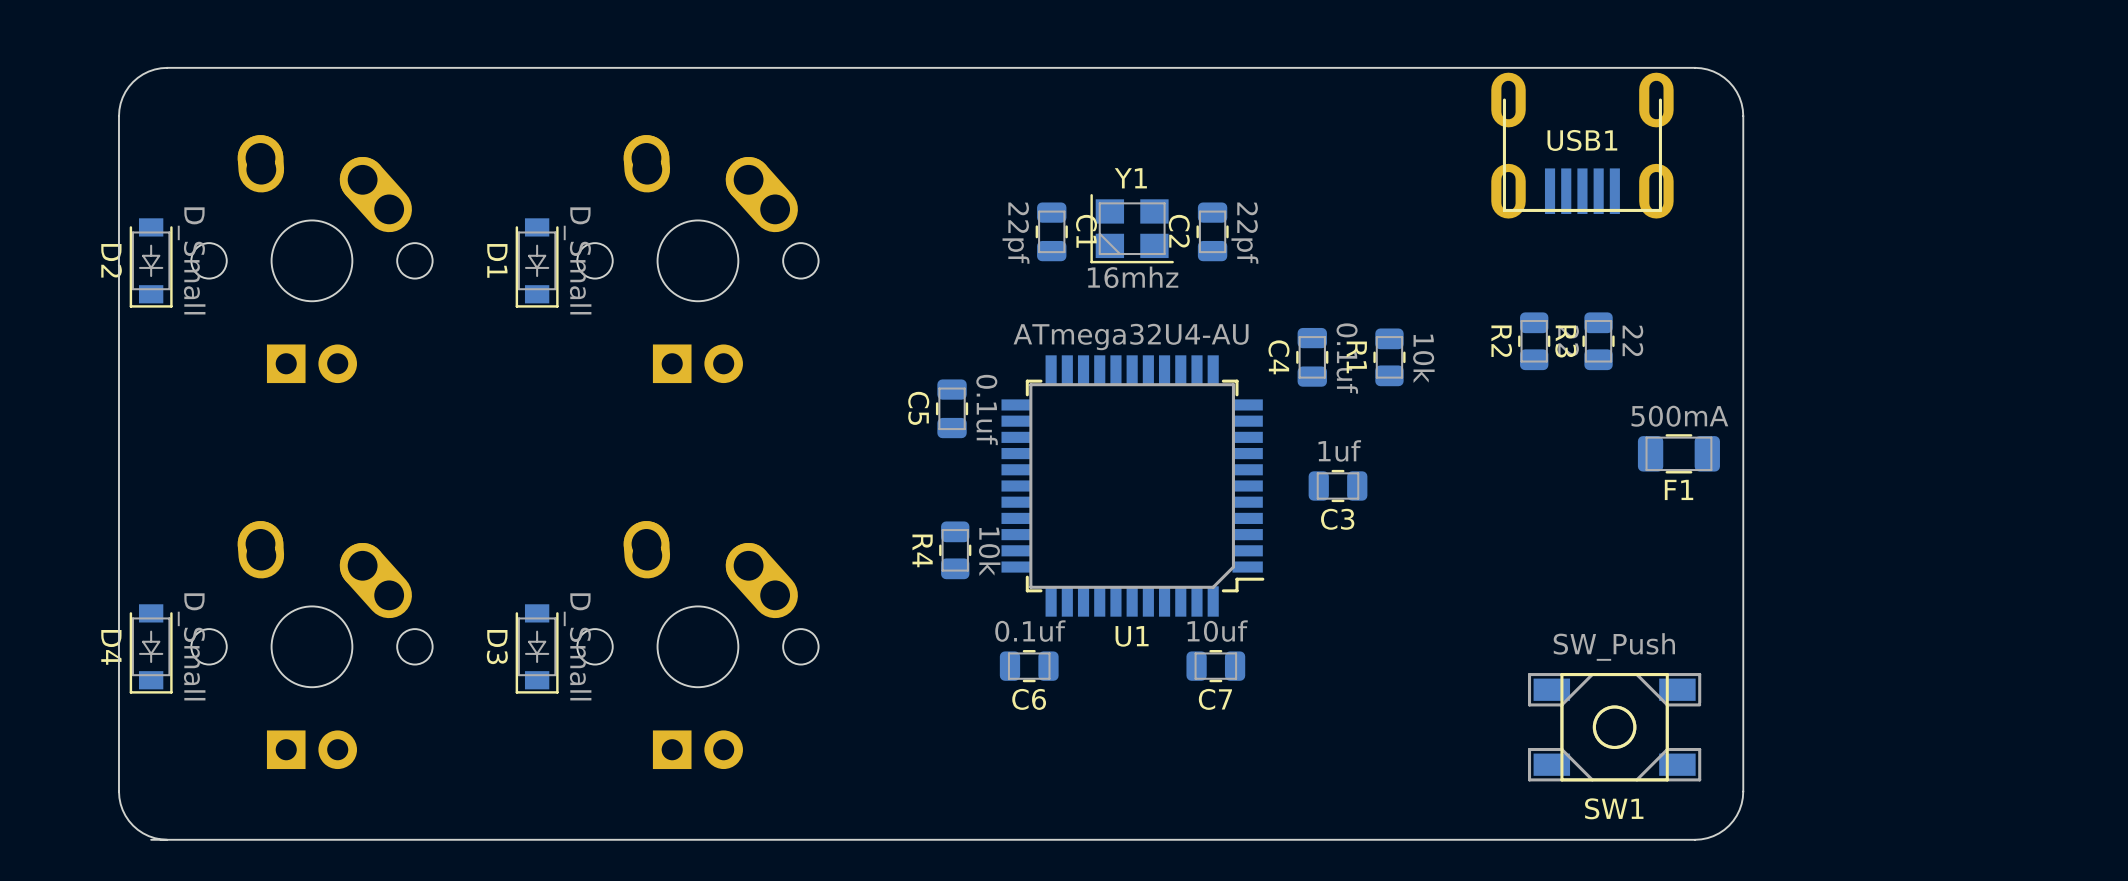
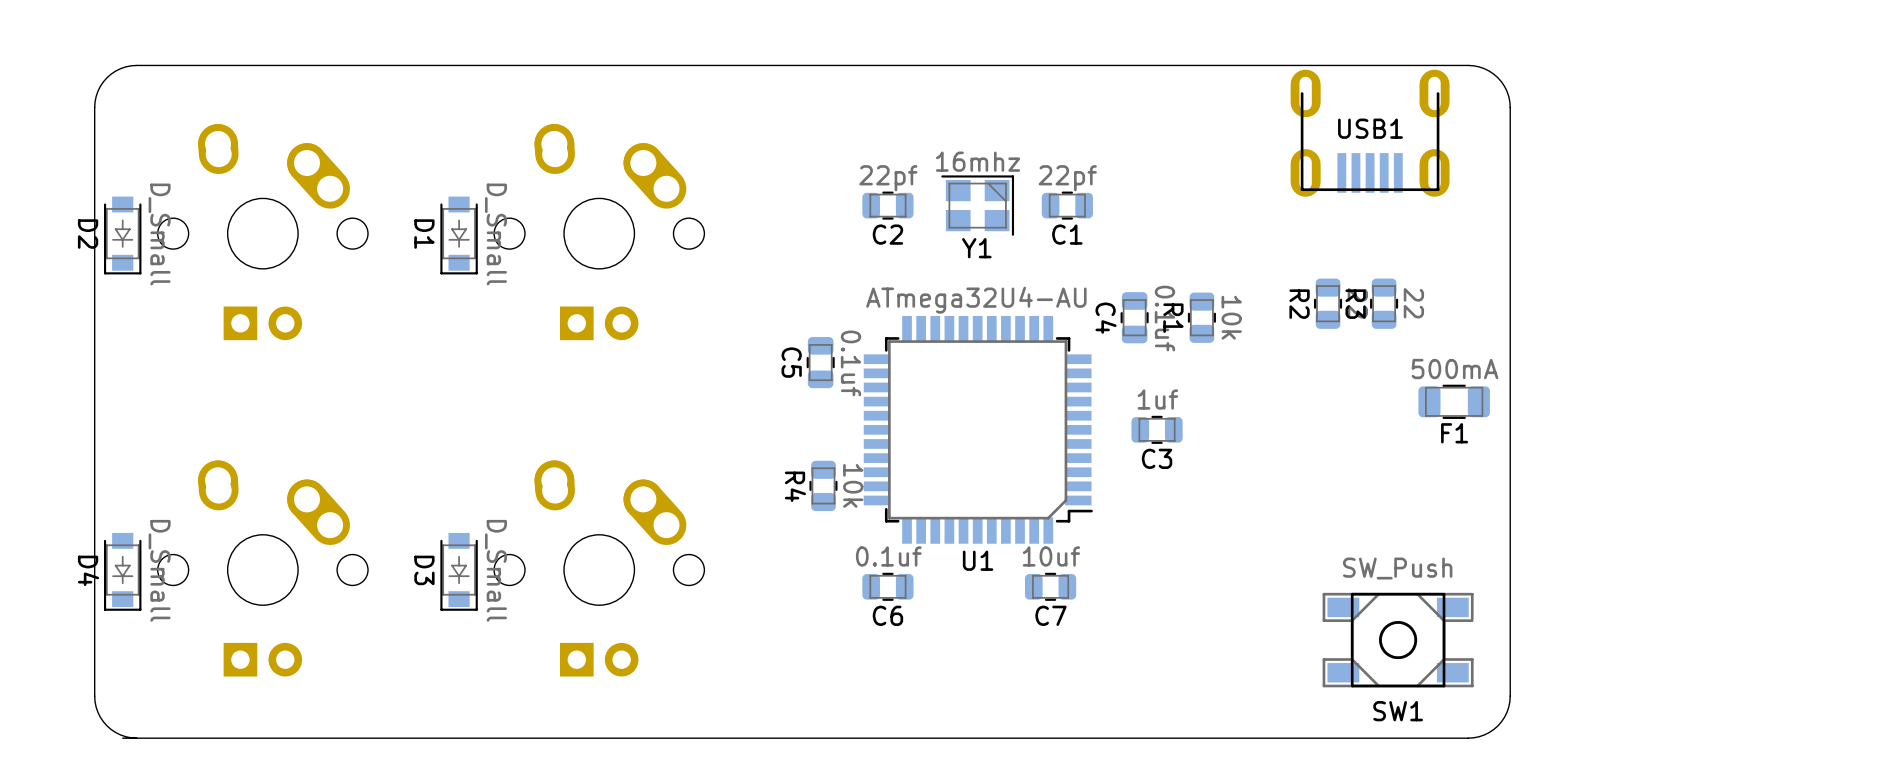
Y1 rotation: 0° (1132, 228) -> 180° (977, 205)
C1 rotation: 0° (1051, 231) -> 90° clockwise (1067, 205)
C1 position: (1051, 231) -> (1067, 205)
C2 name position: C2 (1179, 231) -> C2 (887, 234)
C2 rotation: 0° (1212, 231) -> 90° clockwise (887, 205)
C2 position: (1212, 231) -> (887, 205)
C2 value position: 22pf (1244, 233) -> 22pf (888, 178)

